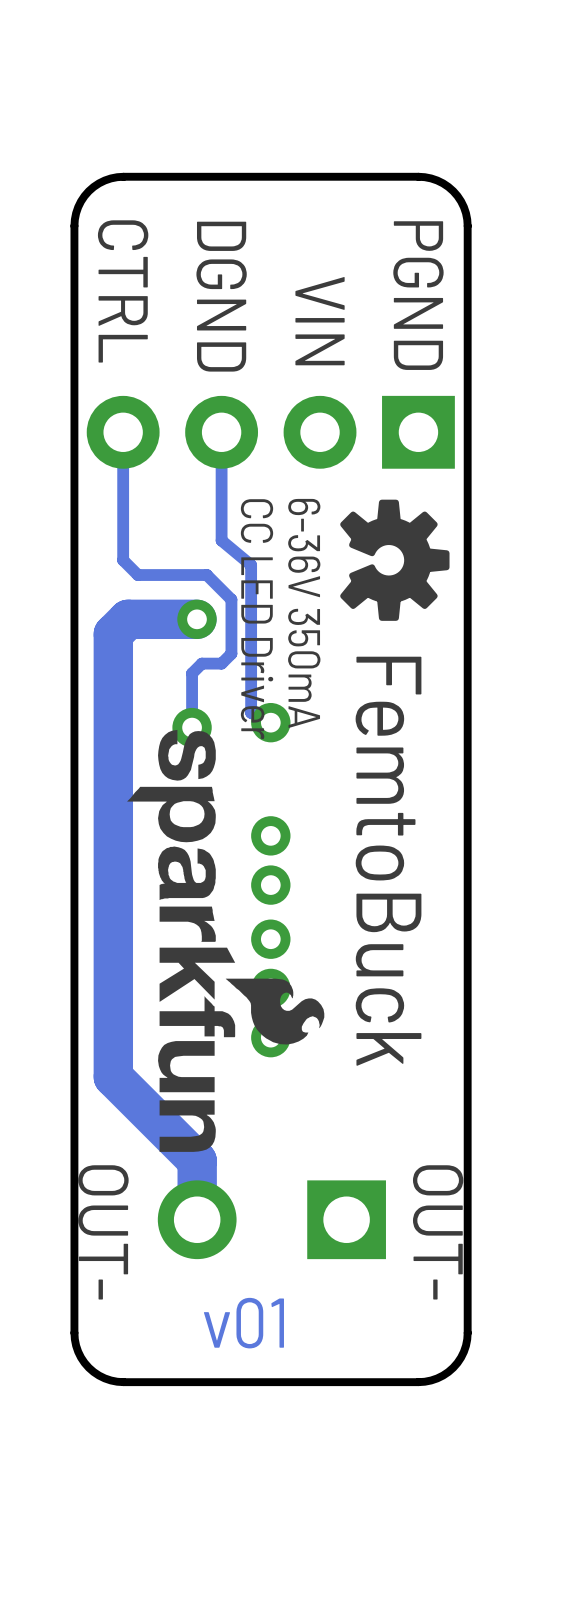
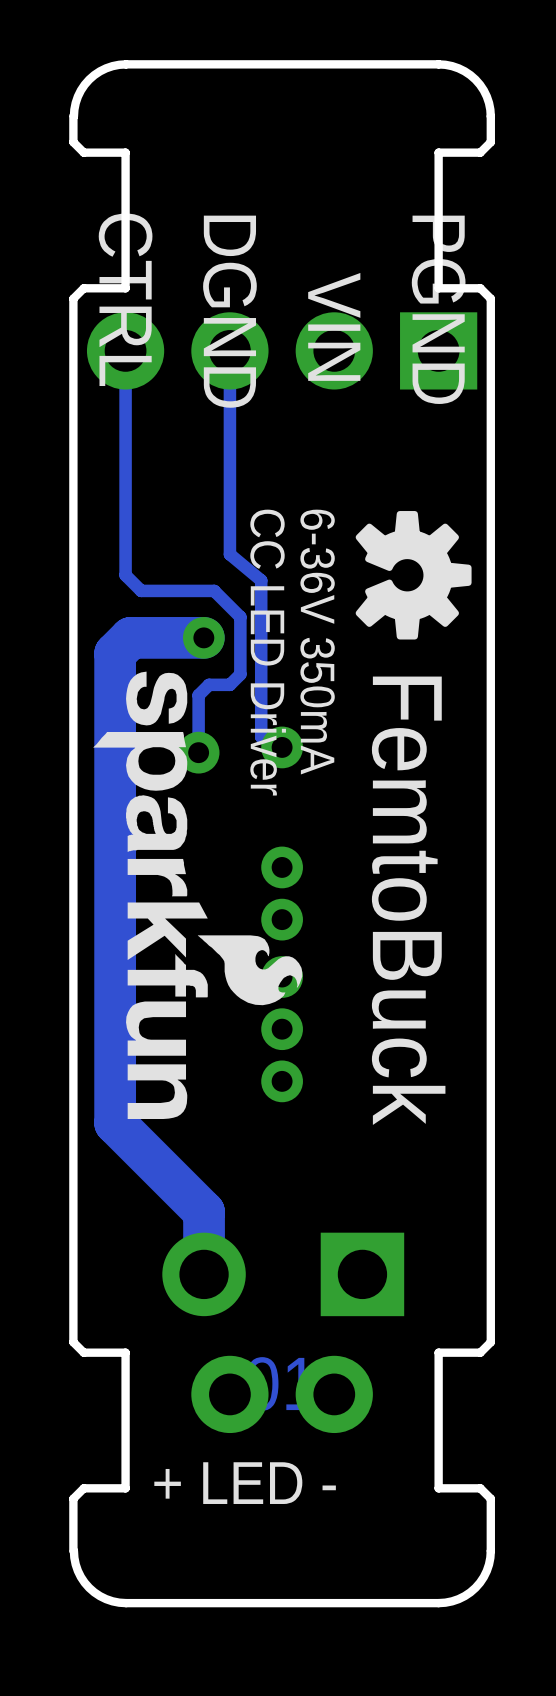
board edge: none -> (73, 116) (73, 142) (83, 152) (125, 152) (125, 288) (83, 288) (73, 298) (73, 1342) (83, 1352) (125, 1352) (125, 1488) (83, 1488) (73, 1498) (73, 1550)
board edge: (467, 299) (465, 213) (461, 201) (453, 191) (443, 183) (431, 178) (418, 176) (117, 177) (104, 180) (93, 186) (81, 201) (76, 213) (74, 225) (74, 1332) (78, 1351) (84, 1362) (93, 1371) (104, 1378) (117, 1381) (424, 1381) (437, 1378) (448, 1371) (457, 1362) (463, 1351) (467, 1332) (467, 1283) -> (490, 298) (480, 288) (438, 288) (438, 152) (480, 152) (490, 142) (490, 109) (486, 96) (475, 79) (458, 68) (438, 64) (119, 64) (100, 71) (84, 84) (75, 103) (73, 116)
track: none -> (125, 350) (125, 439)
track: none -> (229, 350) (229, 439)
part position: (270, 432) -> (282, 350)
drawing position: (225, 940) -> (197, 895)
text: OUT- (103, 1232) -> none
text: OUT- (438, 1232) -> none
board edge: none -> (490, 1342) (480, 1352) (438, 1352) (438, 1488) (480, 1488) (490, 1498) (489, 1564) (480, 1582) (464, 1596) (452, 1601) (438, 1603) (119, 1602) (100, 1596) (84, 1582) (75, 1564) (73, 1550)
part: none -> (282, 1394)
text: none -> + LED - (245, 1483)

